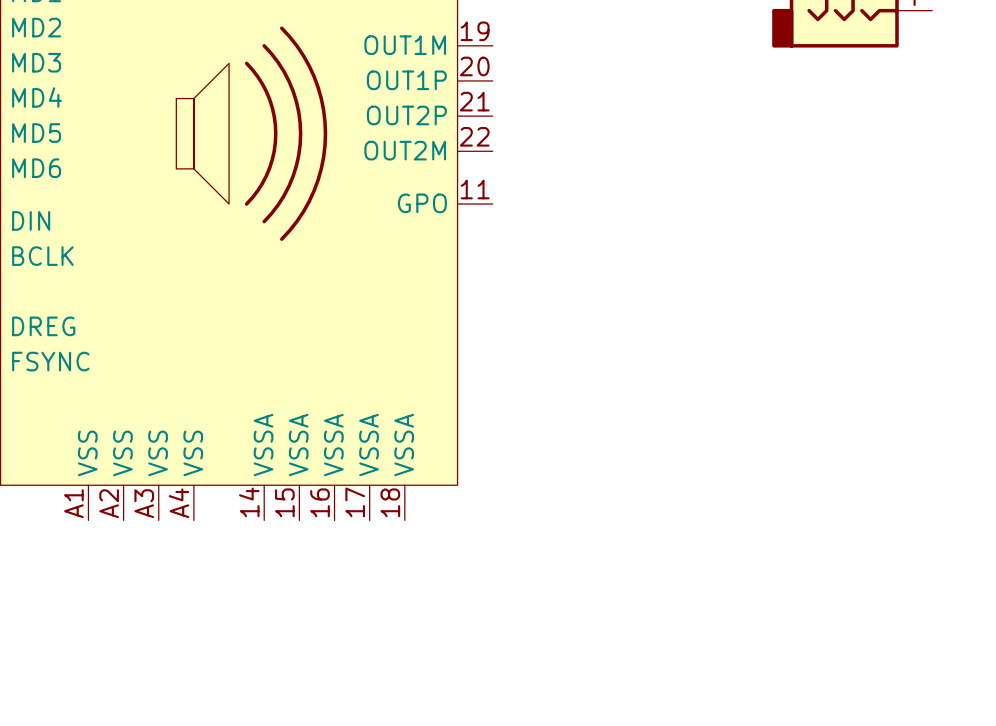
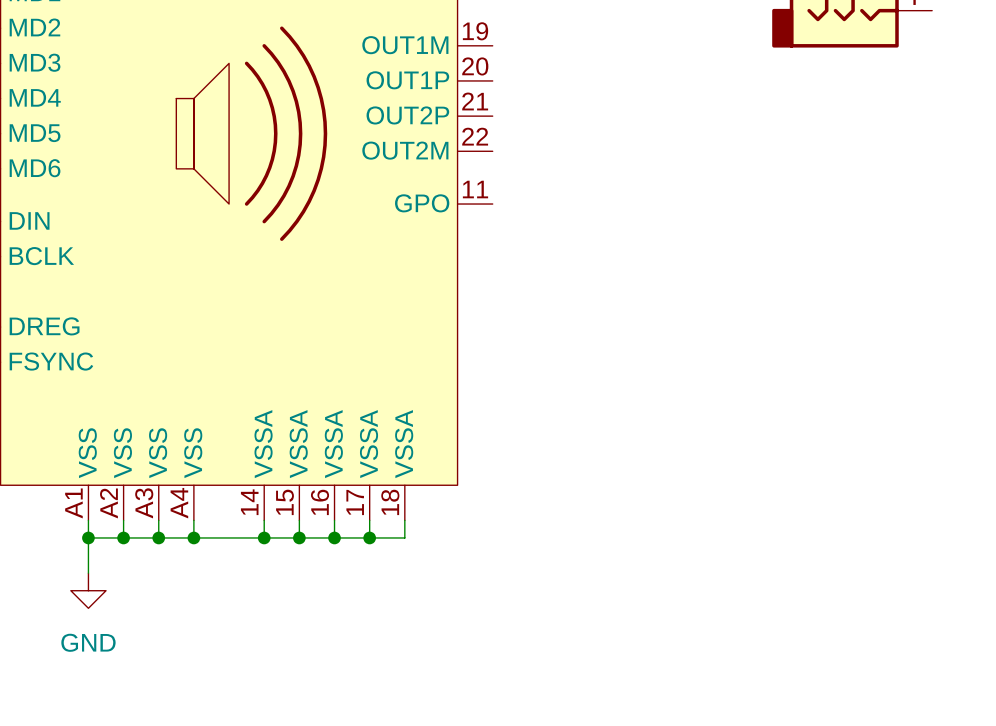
wire: none -> (88, 520) (88, 573)
wire: none -> (123, 520) (123, 537)
wire: none -> (158, 520) (158, 537)
wire: none -> (193, 520) (193, 537)
wire: none -> (264, 520) (264, 537)
wire: none -> (299, 520) (299, 537)
wire: none -> (334, 520) (334, 537)
wire: none -> (369, 520) (369, 537)
wire: none -> (404, 520) (404, 537) (88, 537)
junction: none -> (88, 537)
junction: none -> (123, 537)
junction: none -> (158, 537)
junction: none -> (193, 537)
junction: none -> (264, 537)
junction: none -> (299, 537)
junction: none -> (334, 537)
junction: none -> (369, 537)
power symbol: none -> GND (88, 590)

